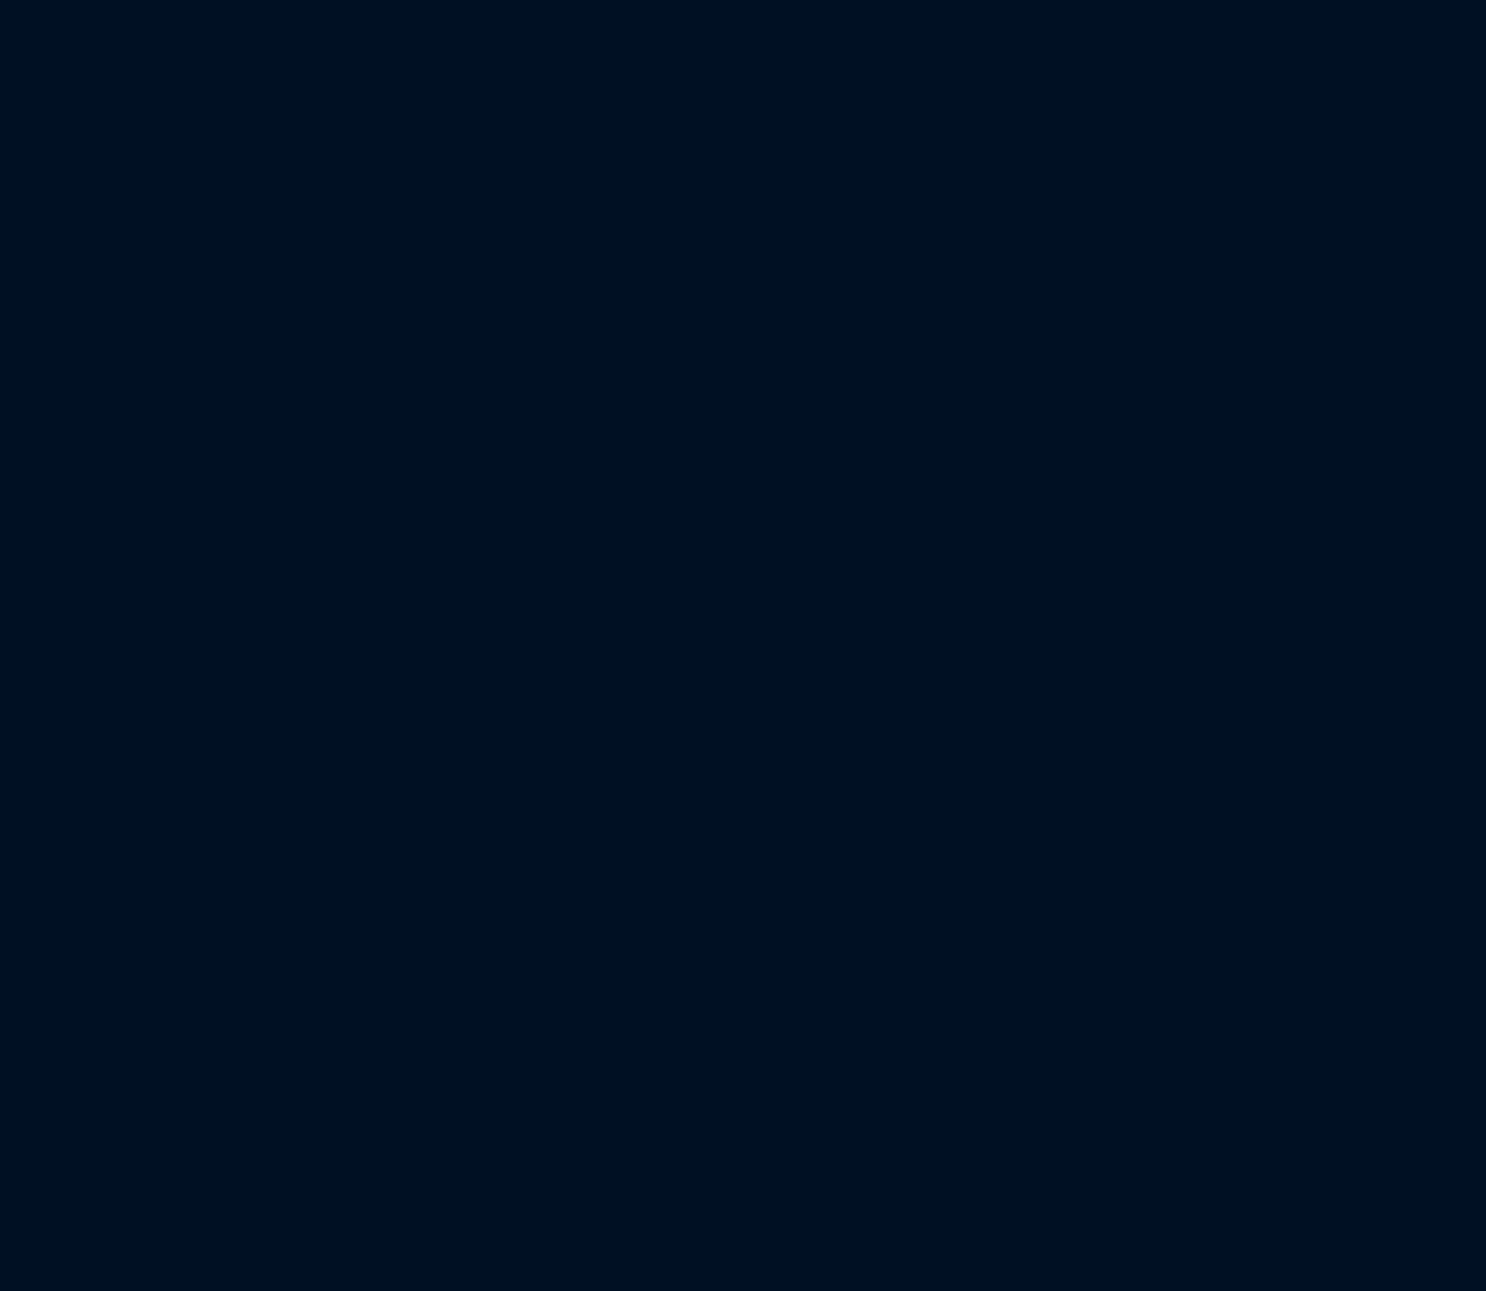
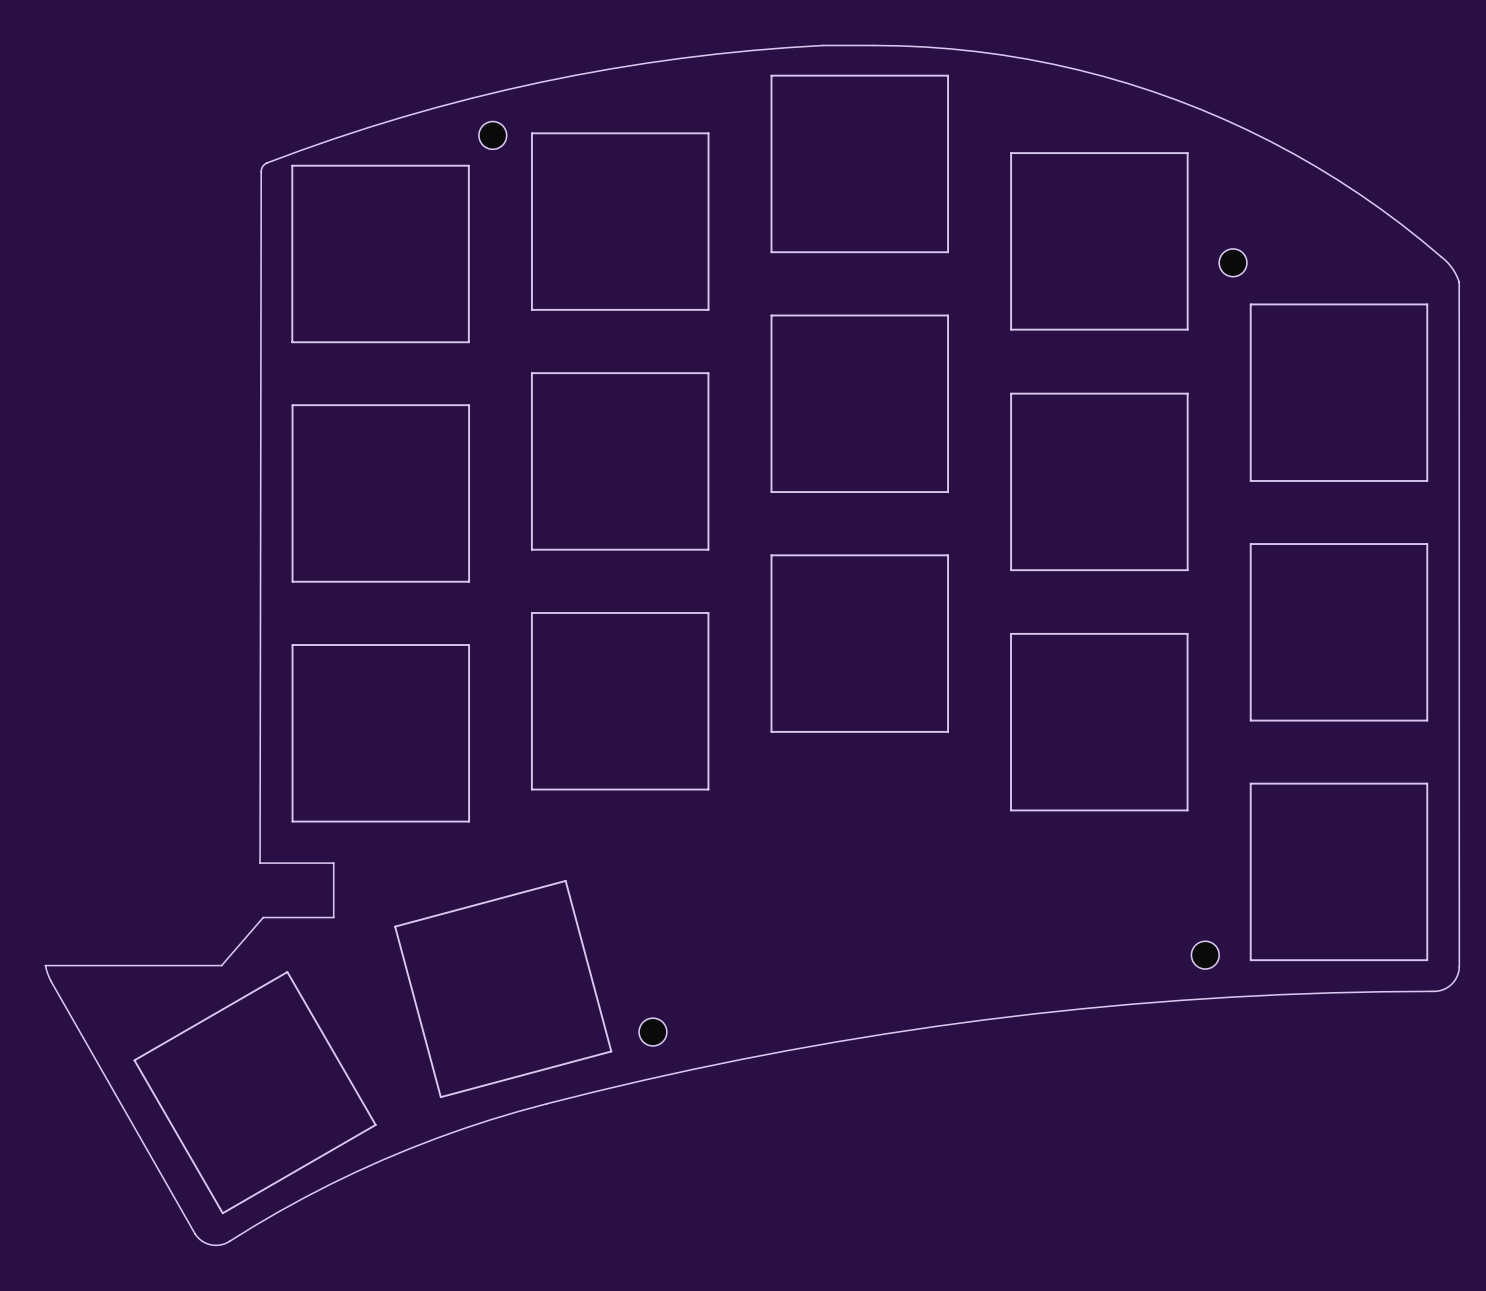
board edge: none -> (823, 45) (925, 47) (1002, 55) (1078, 69) (1152, 91) (1200, 109) (1247, 130) (1315, 166) (1359, 194) (1401, 224) (1452, 268) (1459, 282) (1459, 967) (1457, 976) (1448, 986) (1436, 991) (1231, 997) (1133, 1004) (985, 1019) (837, 1041) (691, 1069) (547, 1103) (463, 1128) (409, 1148) (330, 1184) (279, 1211) (227, 1242) (216, 1245) (205, 1243) (195, 1233) (50, 980) (45, 965) (221, 965) (263, 917) (333, 917) (333, 863) (260, 863) (262, 167) (266, 163) (367, 127) (471, 98) (540, 82) (681, 58) (823, 45)
drawing: none -> [770, 74, 950, 254]
drawing: none -> [531, 132, 710, 311]
part: none -> (492, 135)
drawing: none -> [1010, 152, 1189, 331]
drawing: none -> [291, 164, 470, 344]
part: none -> (1233, 262)
drawing: none -> [1249, 303, 1429, 482]
drawing: none -> [770, 314, 950, 493]
drawing: none -> [530, 372, 710, 551]
drawing: none -> [1010, 392, 1189, 572]
drawing: none -> [291, 404, 471, 583]
drawing: none -> [1249, 543, 1429, 722]
drawing: none -> [770, 554, 950, 733]
drawing: none -> [530, 612, 710, 791]
drawing: none -> [1010, 632, 1189, 812]
drawing: none -> [291, 644, 471, 823]
drawing: none -> [1249, 782, 1429, 962]
drawing: none -> [394, 879, 613, 1099]
part: none -> (1205, 955)
drawing: none -> [133, 971, 377, 1215]
part: none -> (652, 1032)

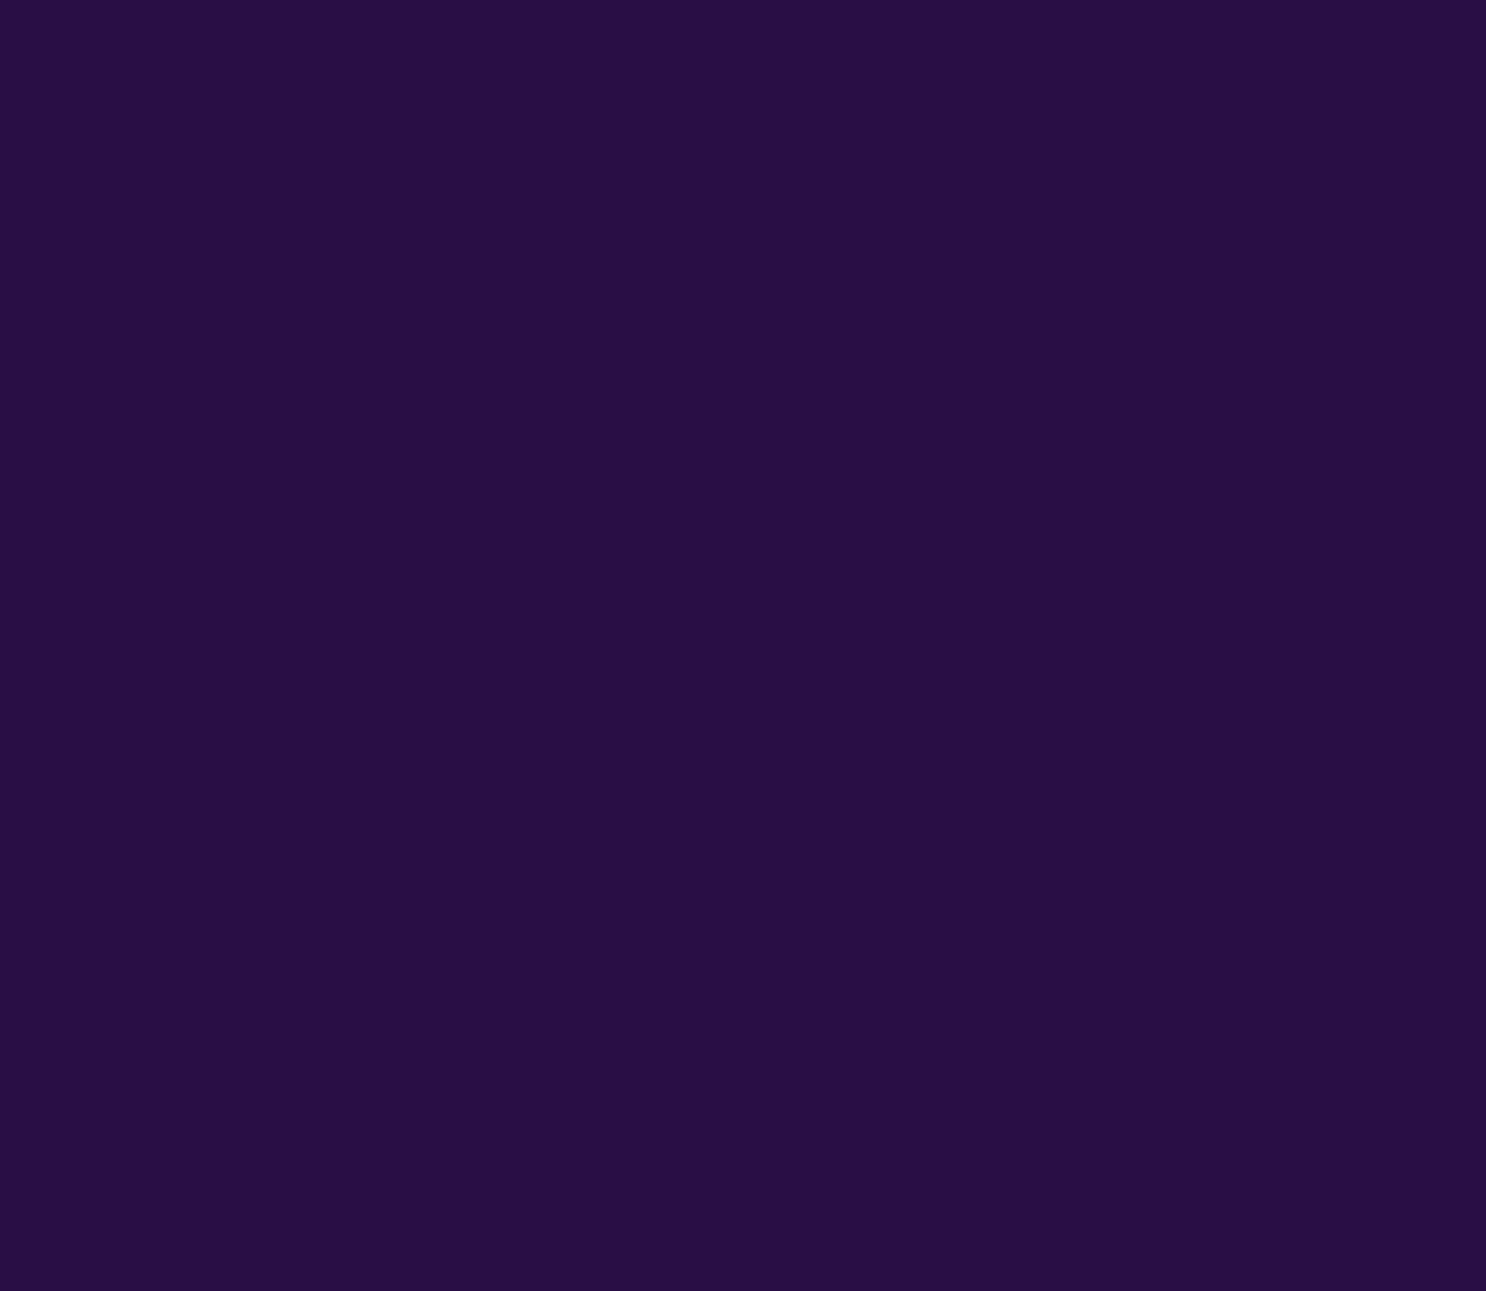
board edge: (823, 45) (925, 47) (1002, 55) (1078, 69) (1152, 91) (1200, 109) (1247, 130) (1315, 166) (1359, 194) (1401, 224) (1452, 268) (1459, 282) (1459, 967) (1457, 976) (1448, 986) (1436, 991) (1231, 997) (1133, 1004) (985, 1019) (837, 1041) (691, 1069) (547, 1103) (463, 1128) (409, 1148) (330, 1184) (279, 1211) (227, 1242) (216, 1245) (205, 1243) (195, 1233) (50, 980) (45, 965) (221, 965) (263, 917) (333, 917) (333, 863) (260, 863) (262, 167) (266, 163) (367, 127) (471, 98) (540, 82) (681, 58) (823, 45) -> none
drawing: [770, 74, 950, 254] -> none
drawing: [531, 132, 710, 311] -> none
part: (492, 135) -> none
drawing: [1010, 152, 1189, 331] -> none
drawing: [291, 164, 470, 344] -> none
part: (1233, 262) -> none
drawing: [1249, 303, 1429, 482] -> none
drawing: [770, 314, 950, 493] -> none
drawing: [530, 372, 710, 551] -> none
drawing: [1010, 392, 1189, 572] -> none
drawing: [291, 404, 471, 583] -> none
drawing: [1249, 543, 1429, 722] -> none
drawing: [770, 554, 950, 733] -> none
drawing: [530, 612, 710, 791] -> none
drawing: [1010, 632, 1189, 812] -> none
drawing: [291, 644, 471, 823] -> none
drawing: [1249, 782, 1429, 962] -> none
drawing: [394, 879, 613, 1099] -> none
part: (1205, 955) -> none
drawing: [133, 971, 377, 1215] -> none
part: (652, 1032) -> none

